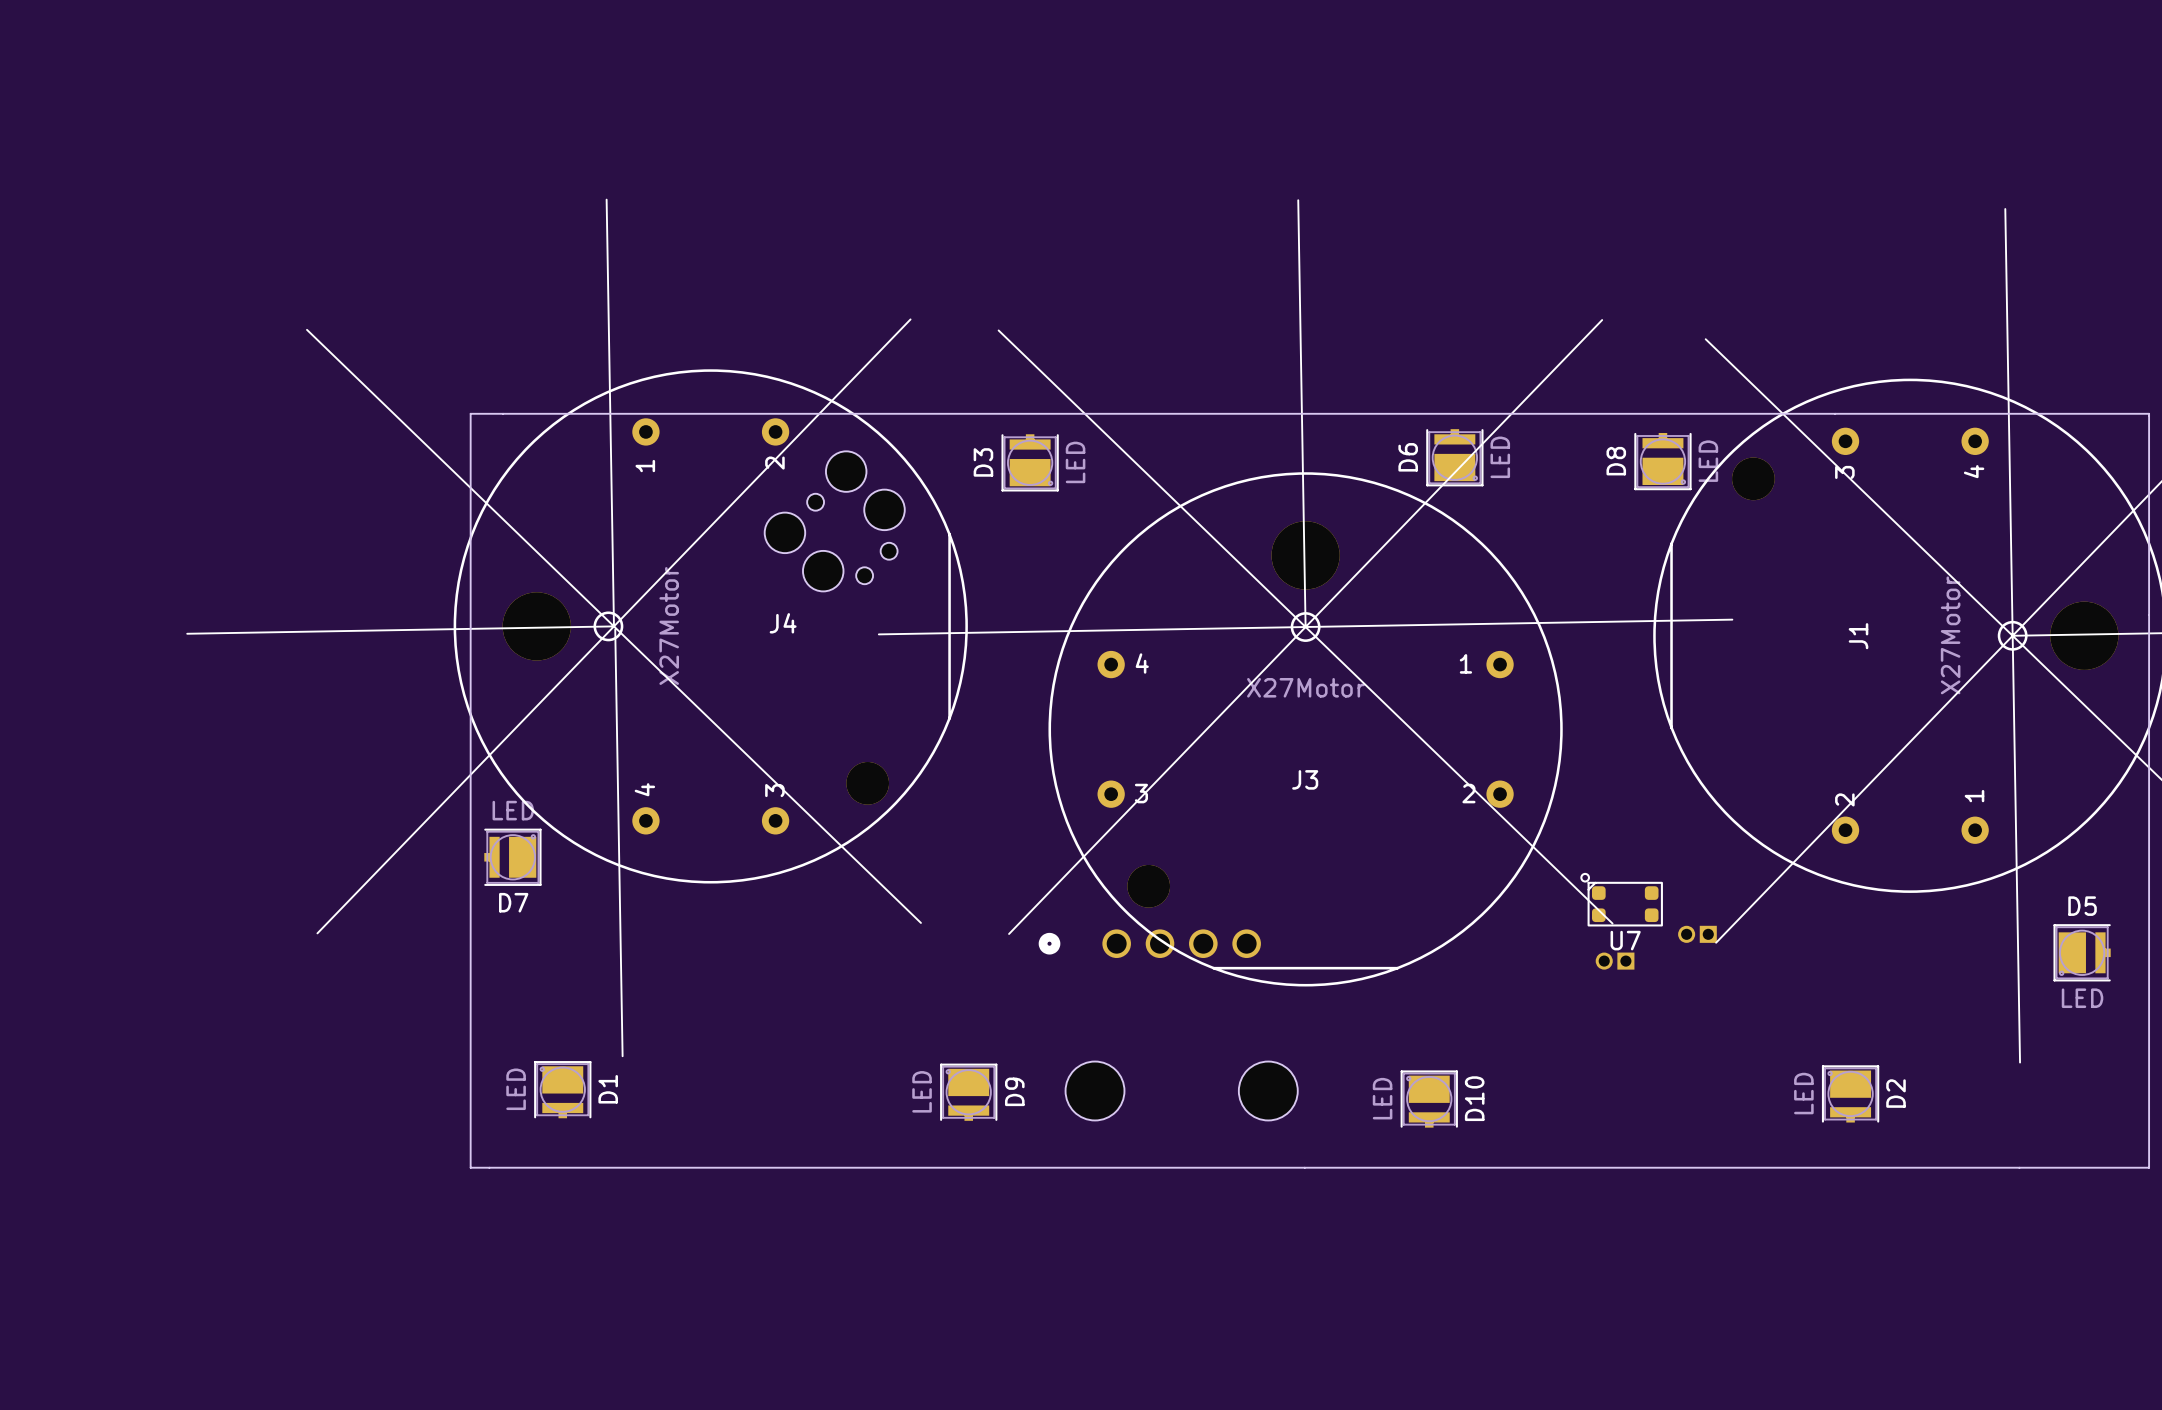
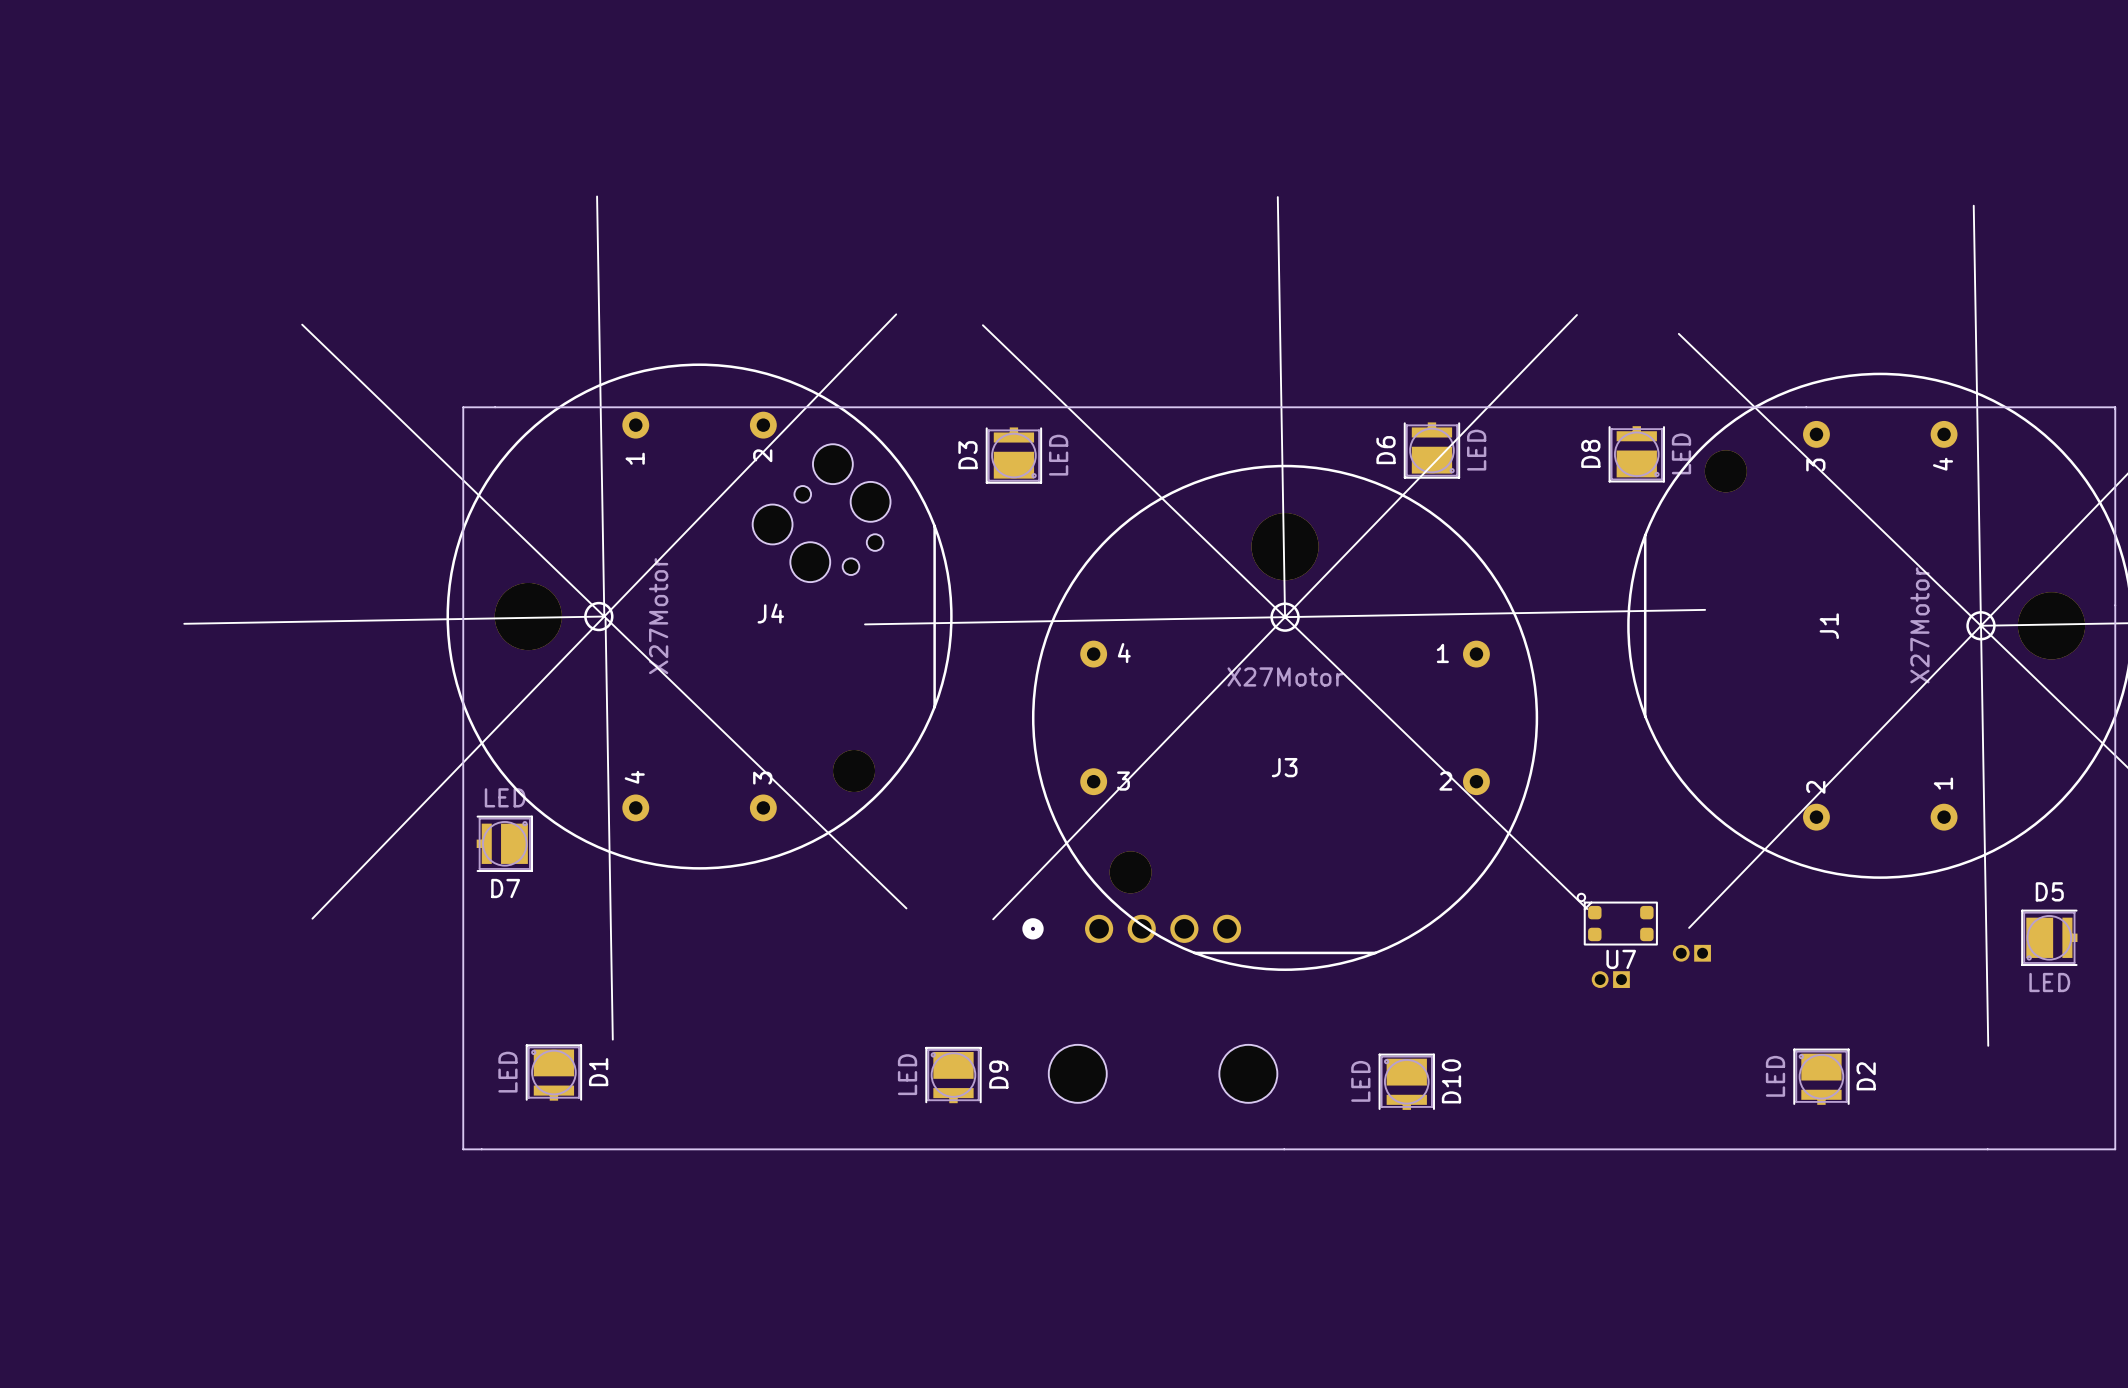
U7 position: (1621, 899) -> (1617, 919)
part position: (1697, 934) -> (1691, 953)
part position: (1615, 961) -> (1610, 979)

